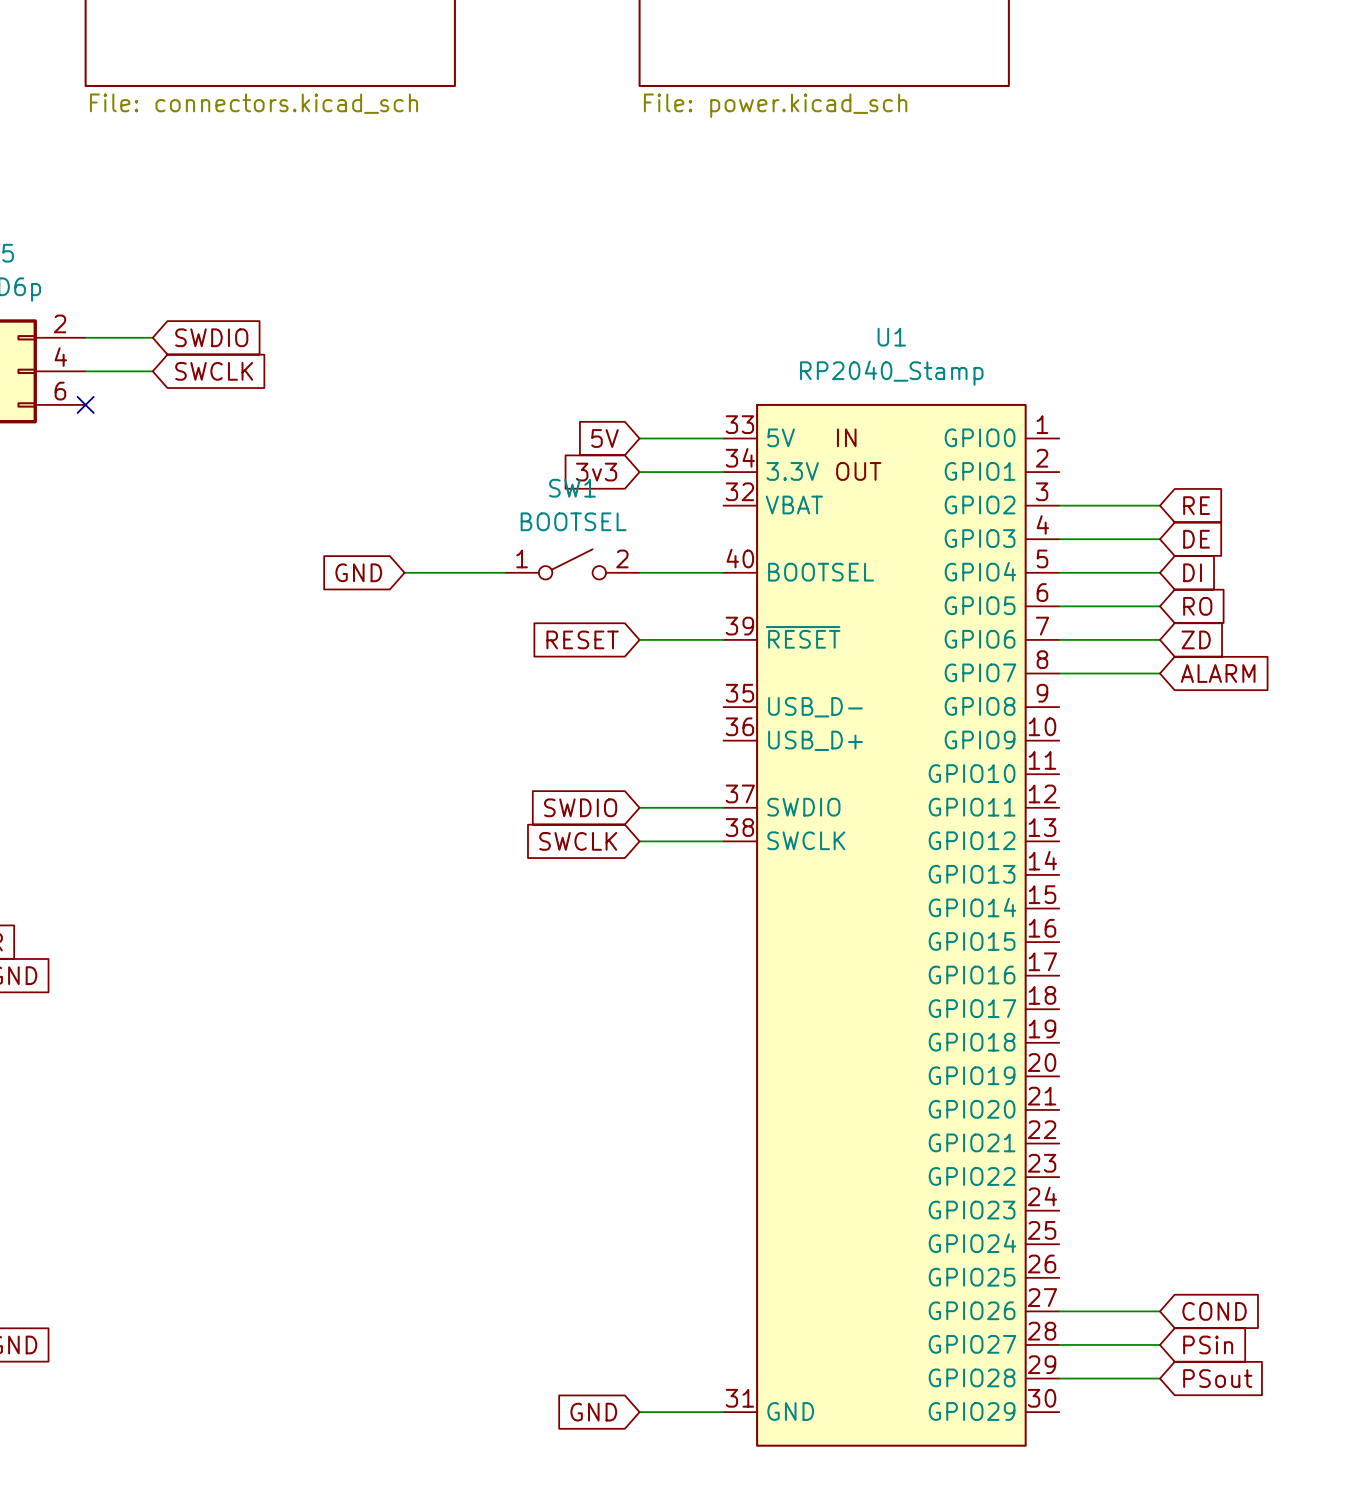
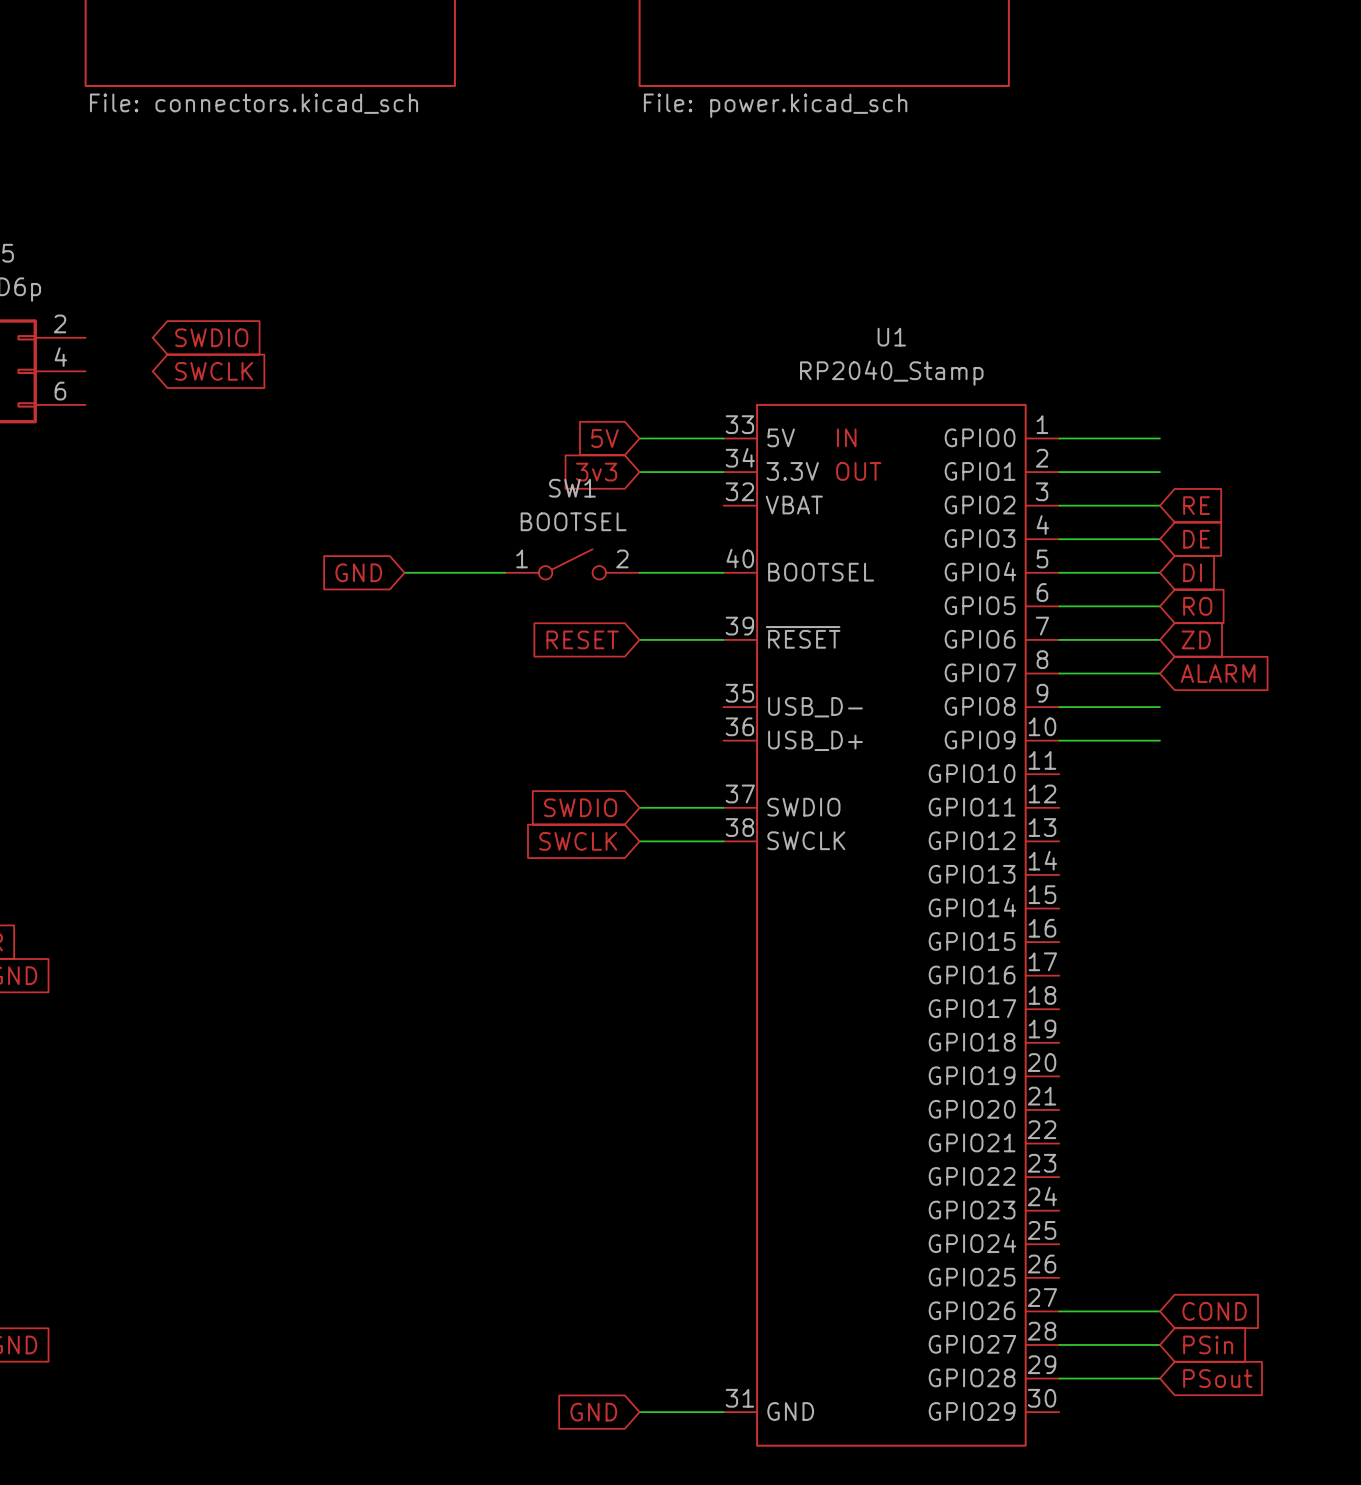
wire: (85, 337) (152, 337) -> none
wire: (85, 371) (152, 371) -> none
no-connect mark: (85, 404) -> none
wire: none -> (1059, 438) (1159, 438)
wire: none -> (1059, 472) (1159, 472)
wire: none -> (1059, 707) (1159, 707)
wire: none -> (1059, 740) (1159, 740)

